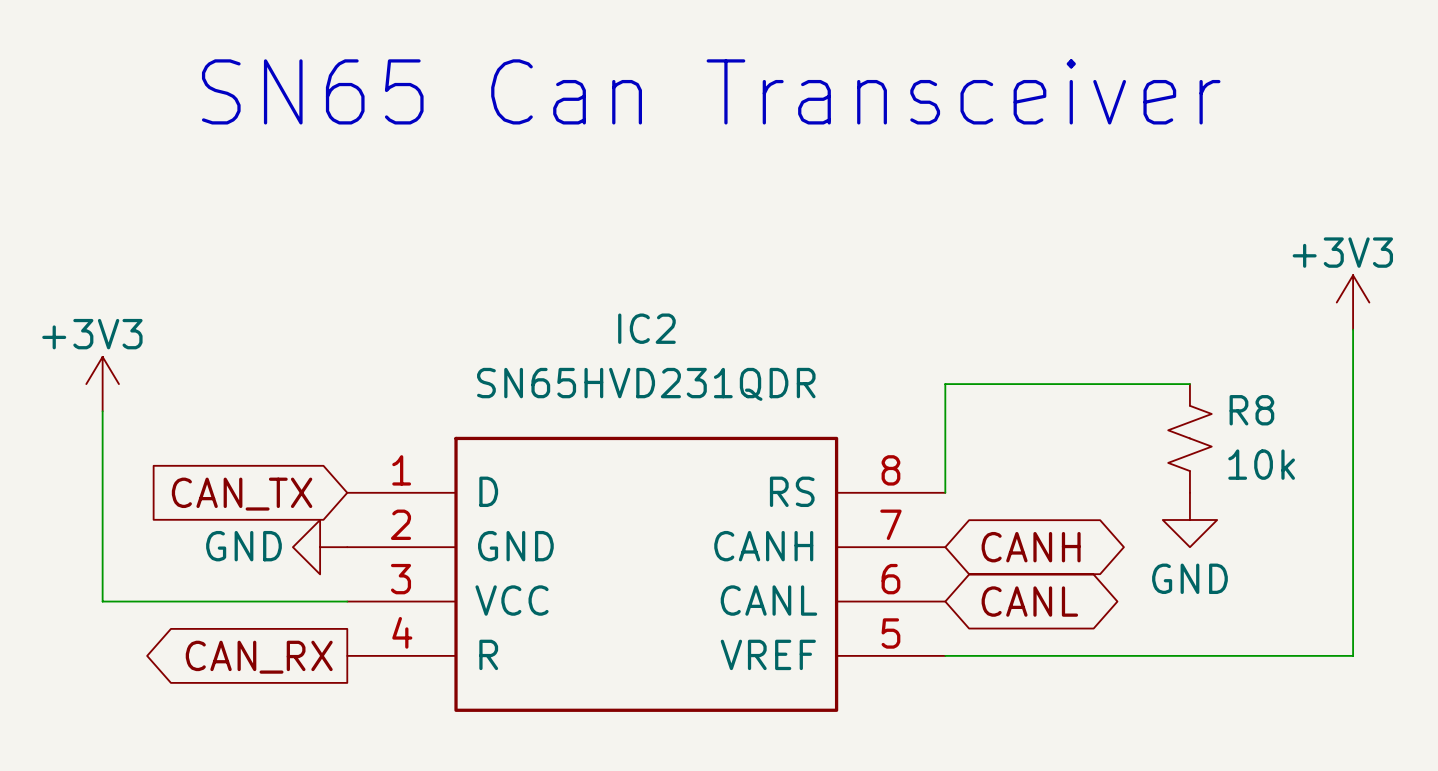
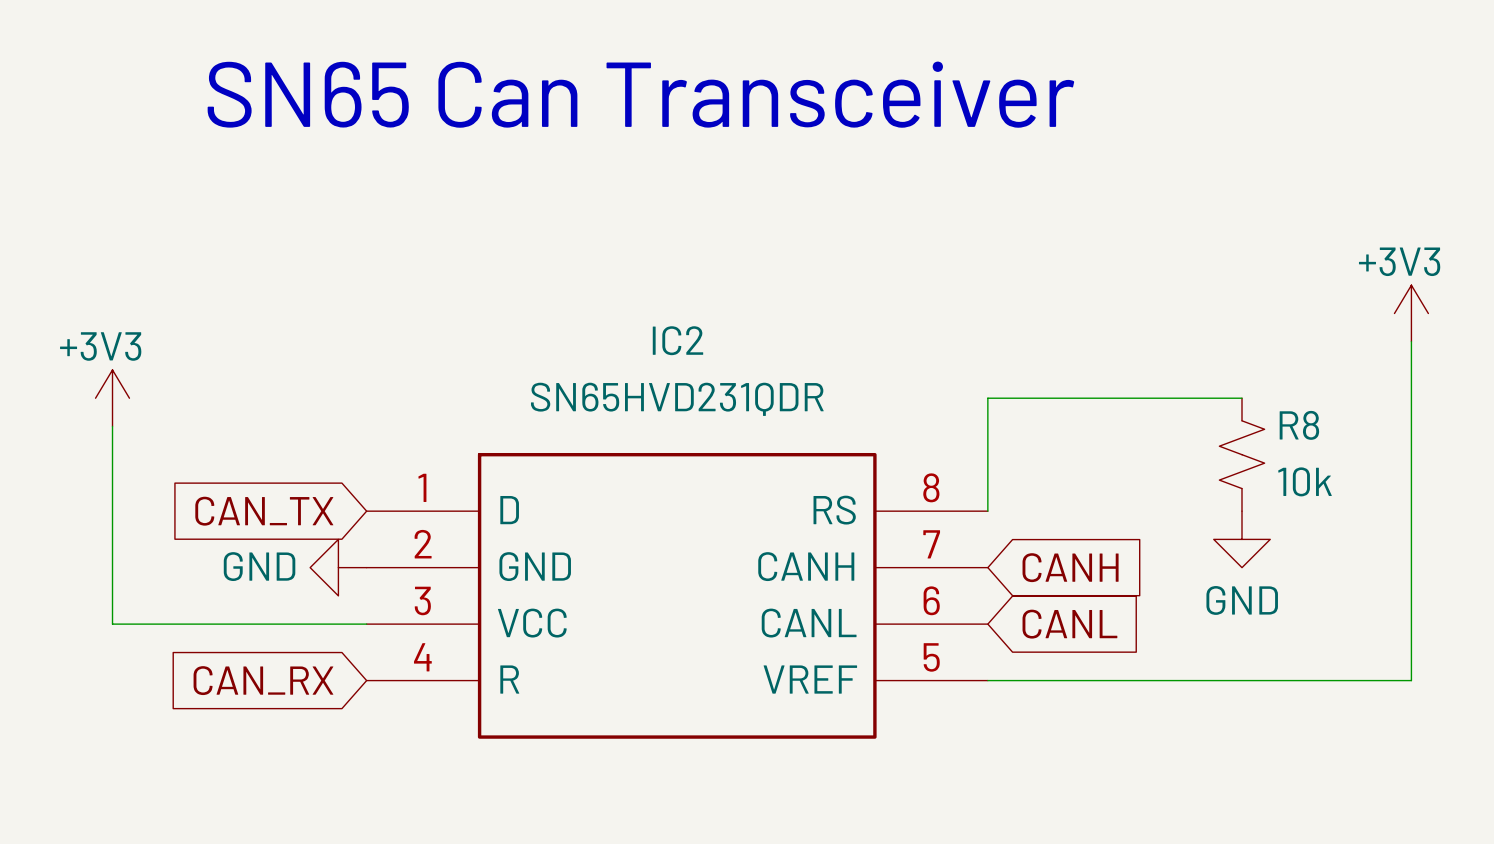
global label shape: bidirectional (1031, 547) -> input (1070, 567)
global label shape: bidirectional (1029, 601) -> input (1069, 624)
global label shape: output (259, 657) -> input (263, 680)

